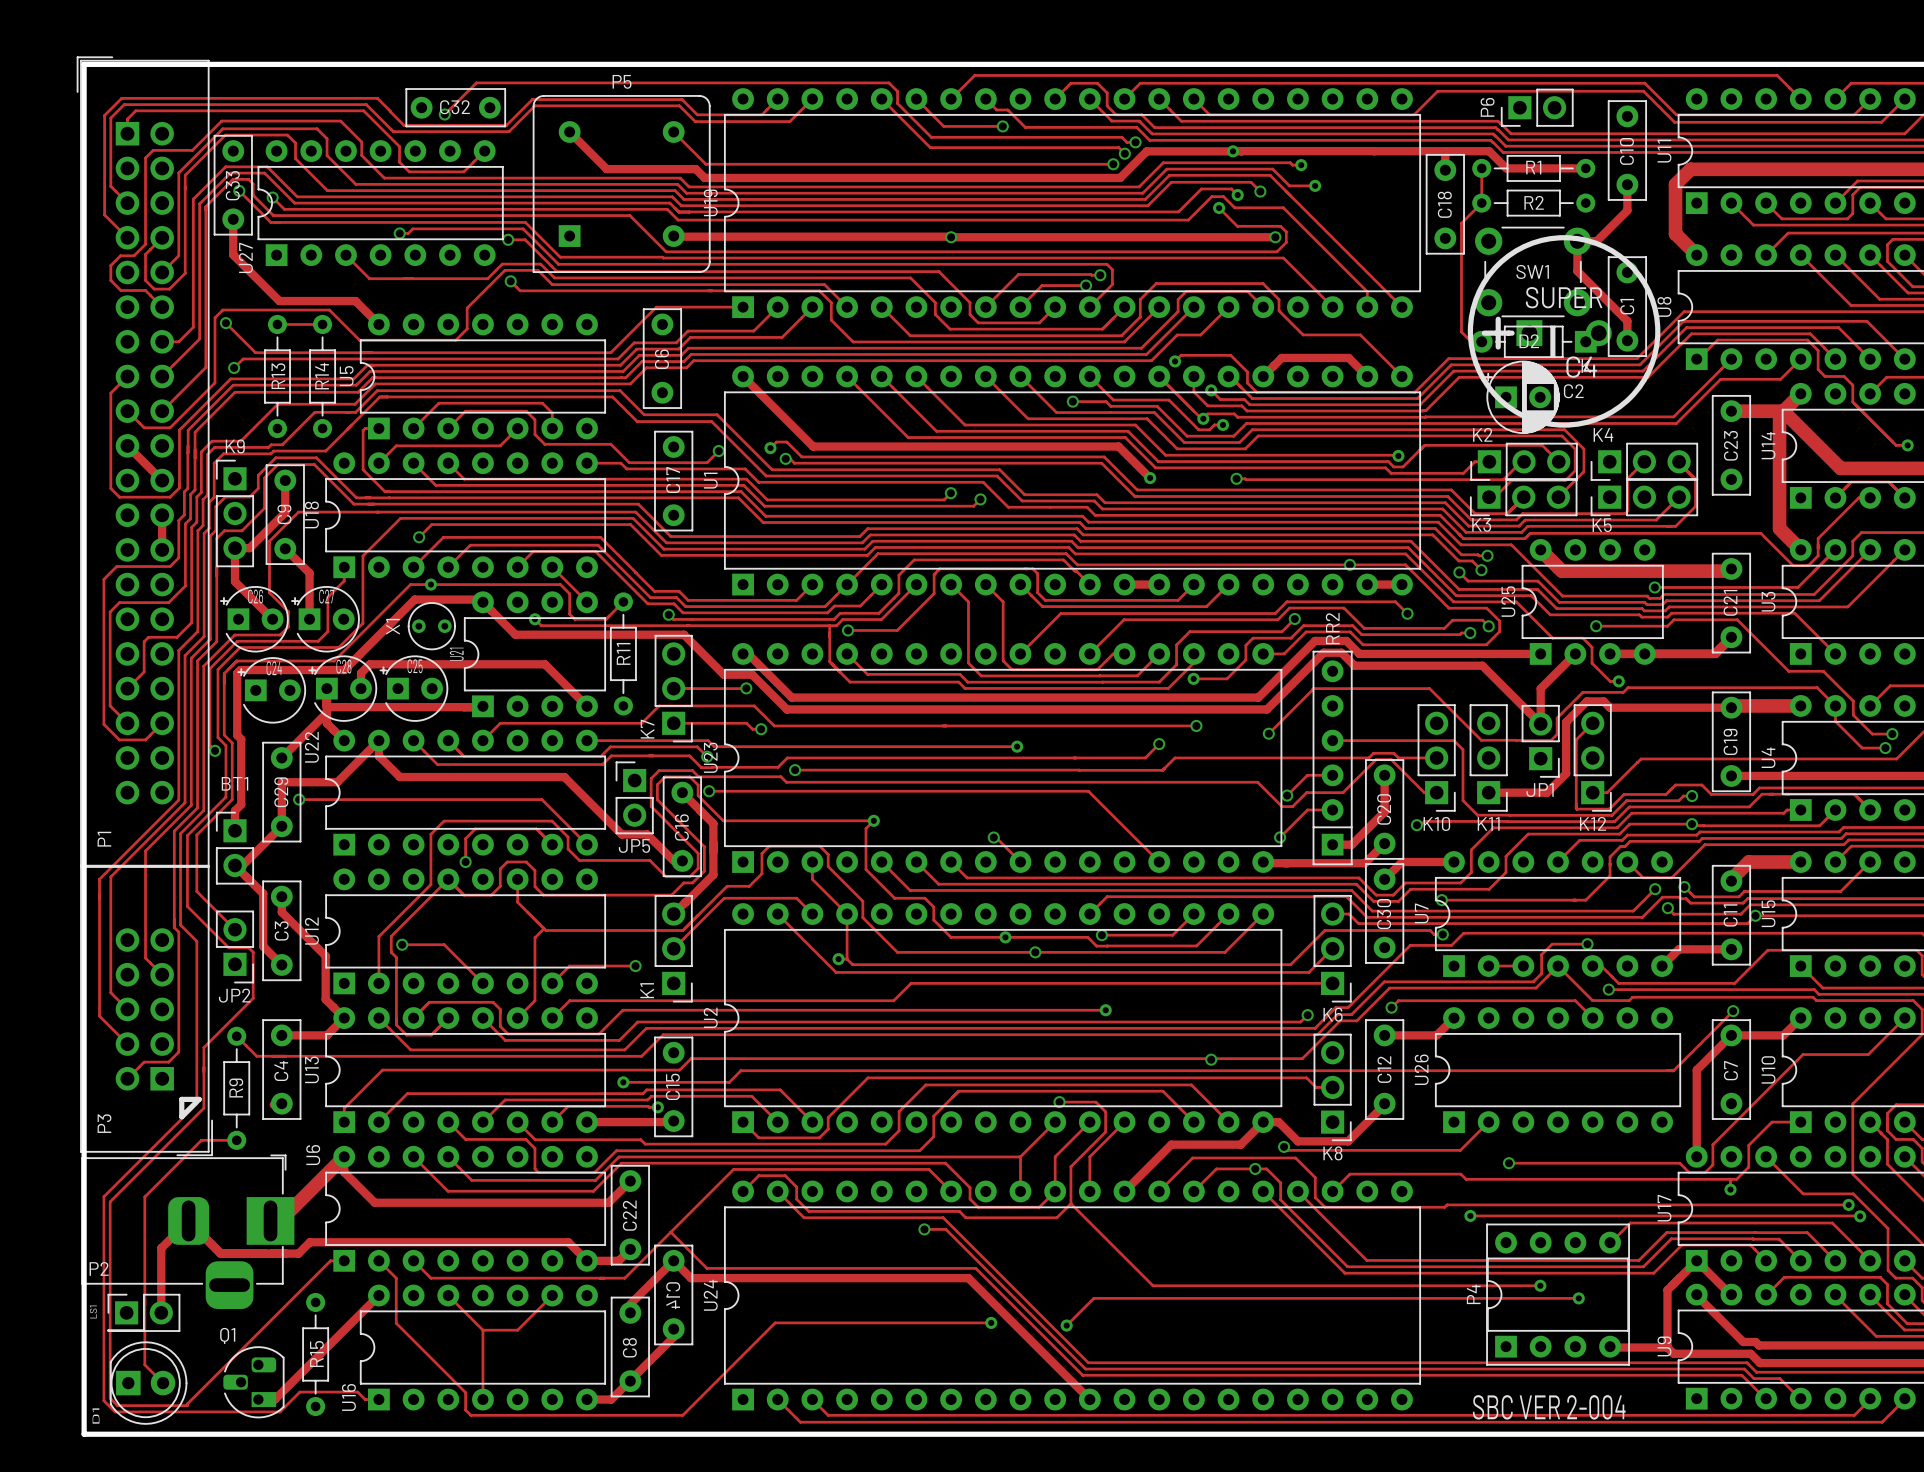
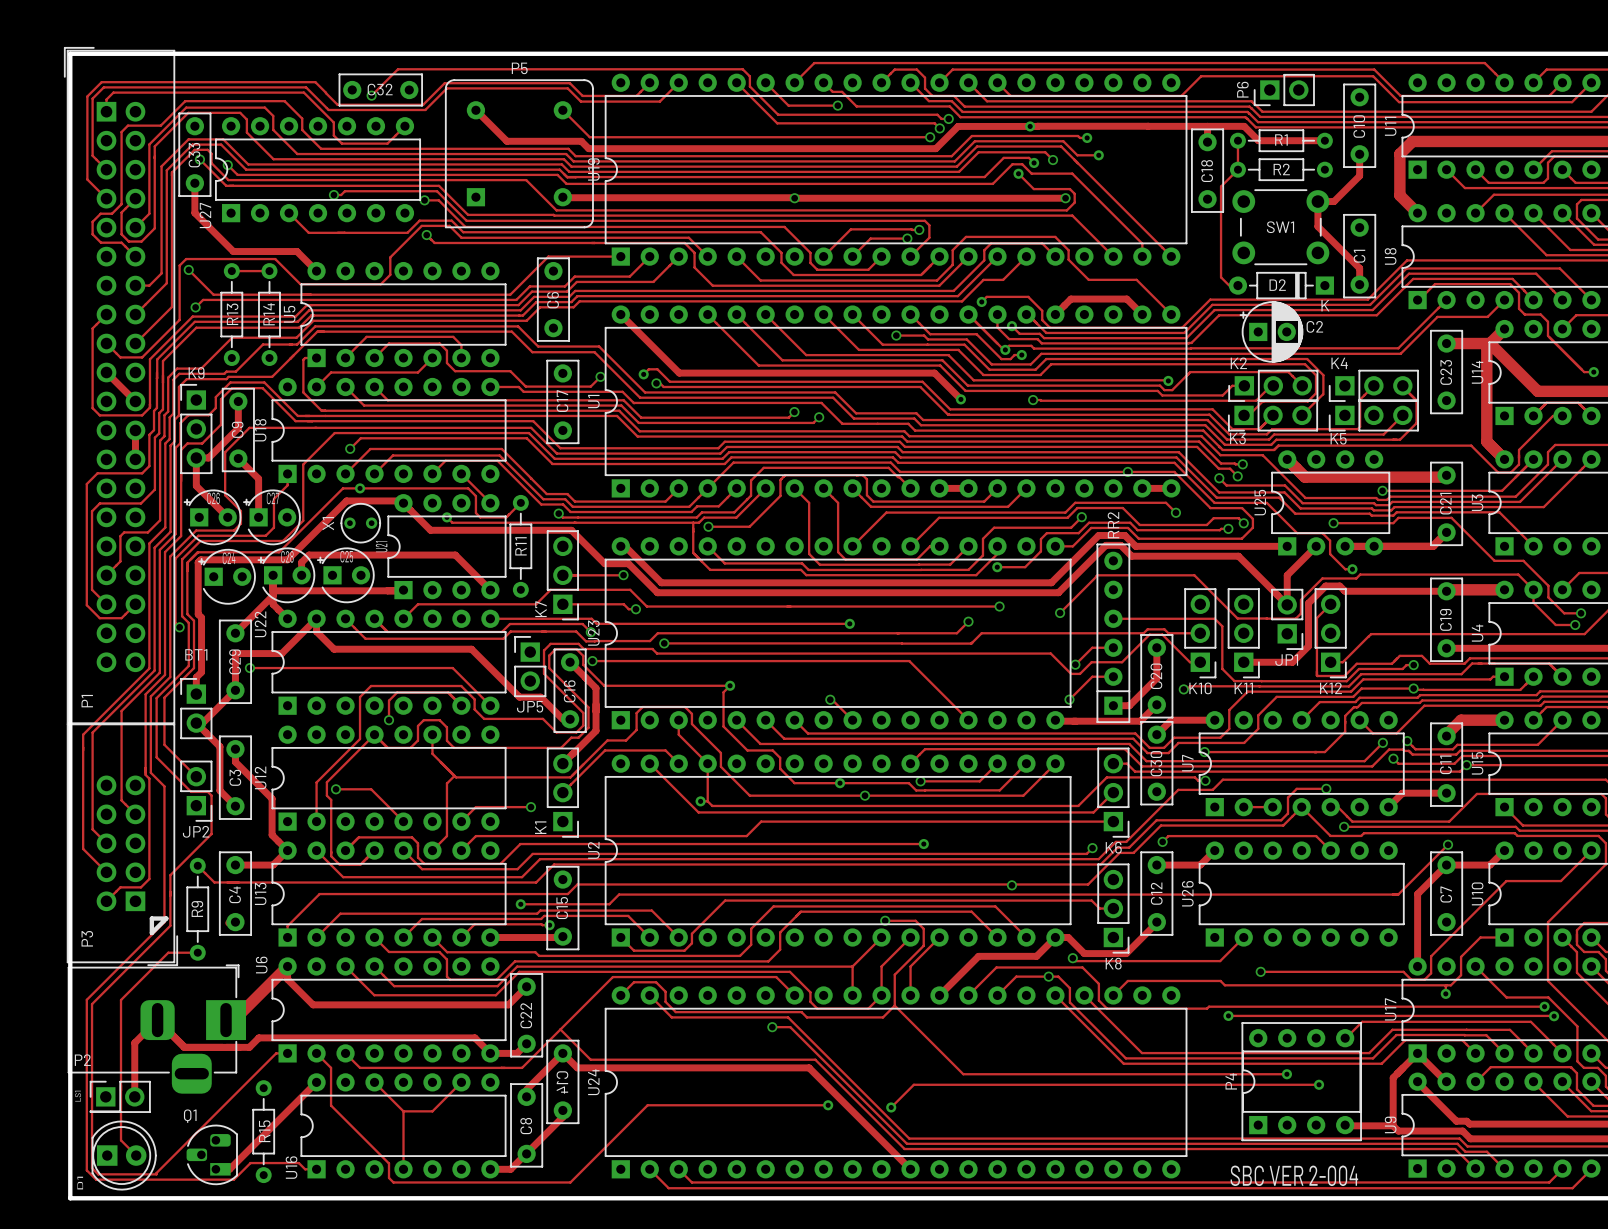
C4: SUPER (1564, 331) -> none

